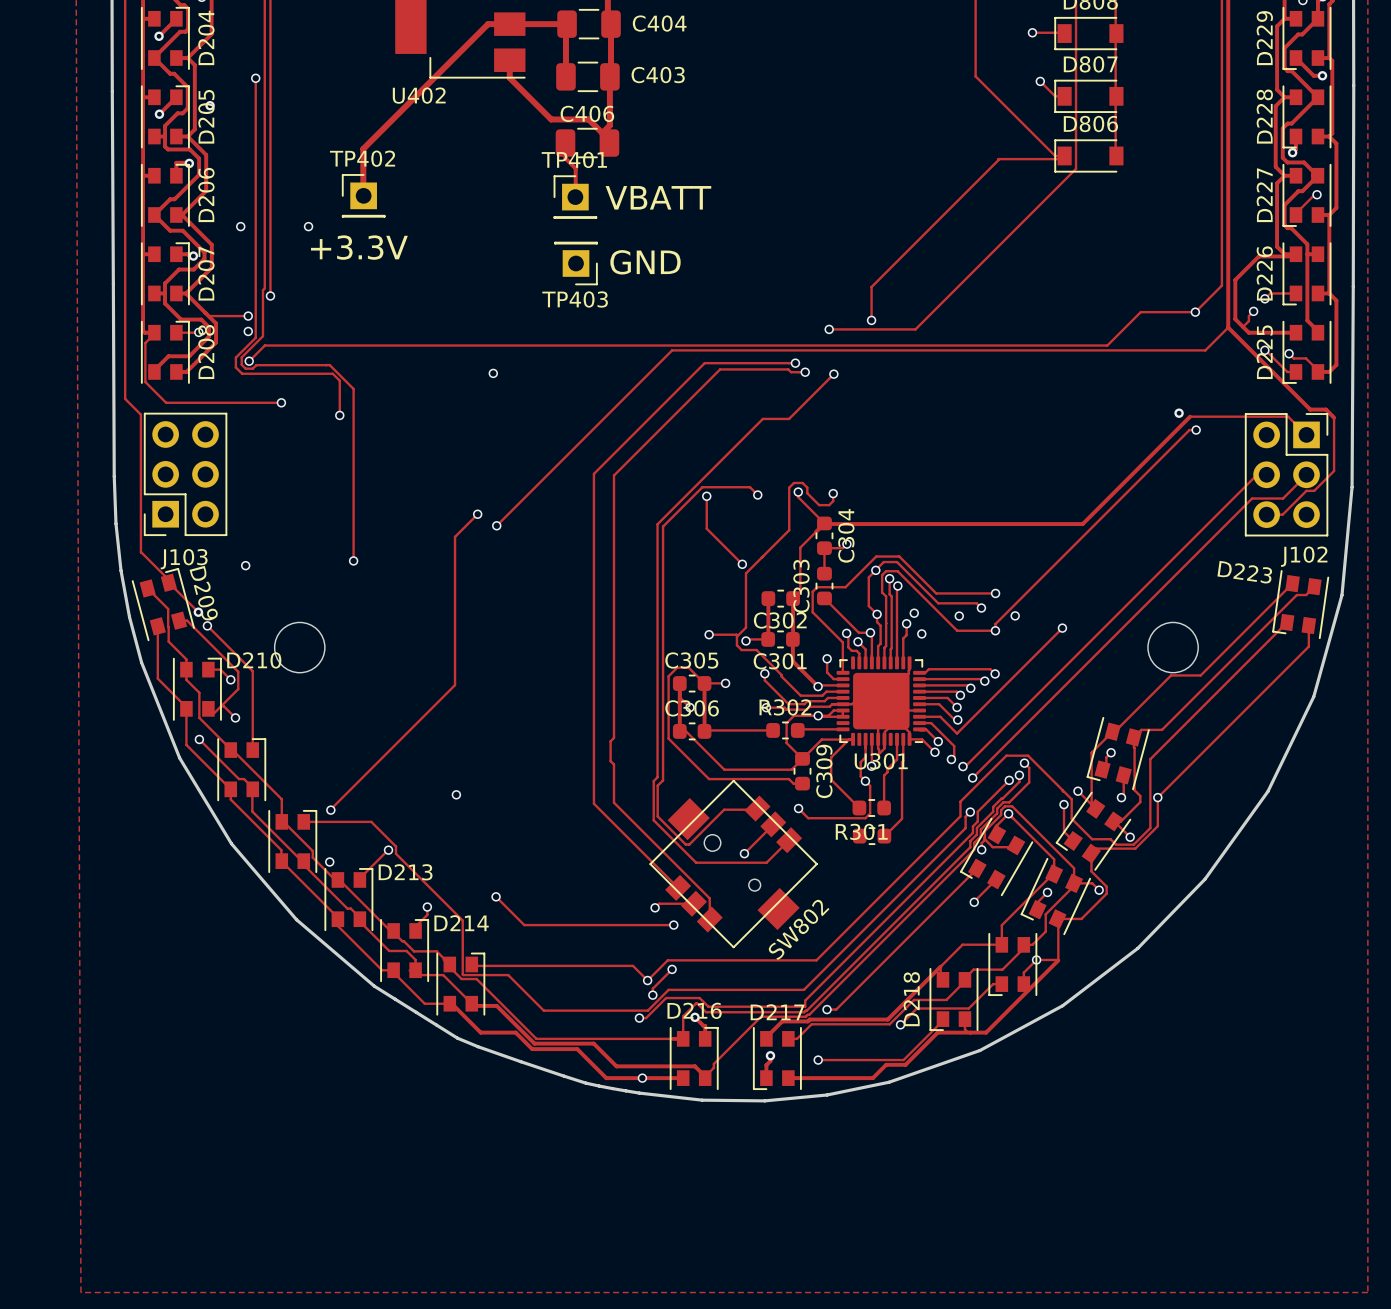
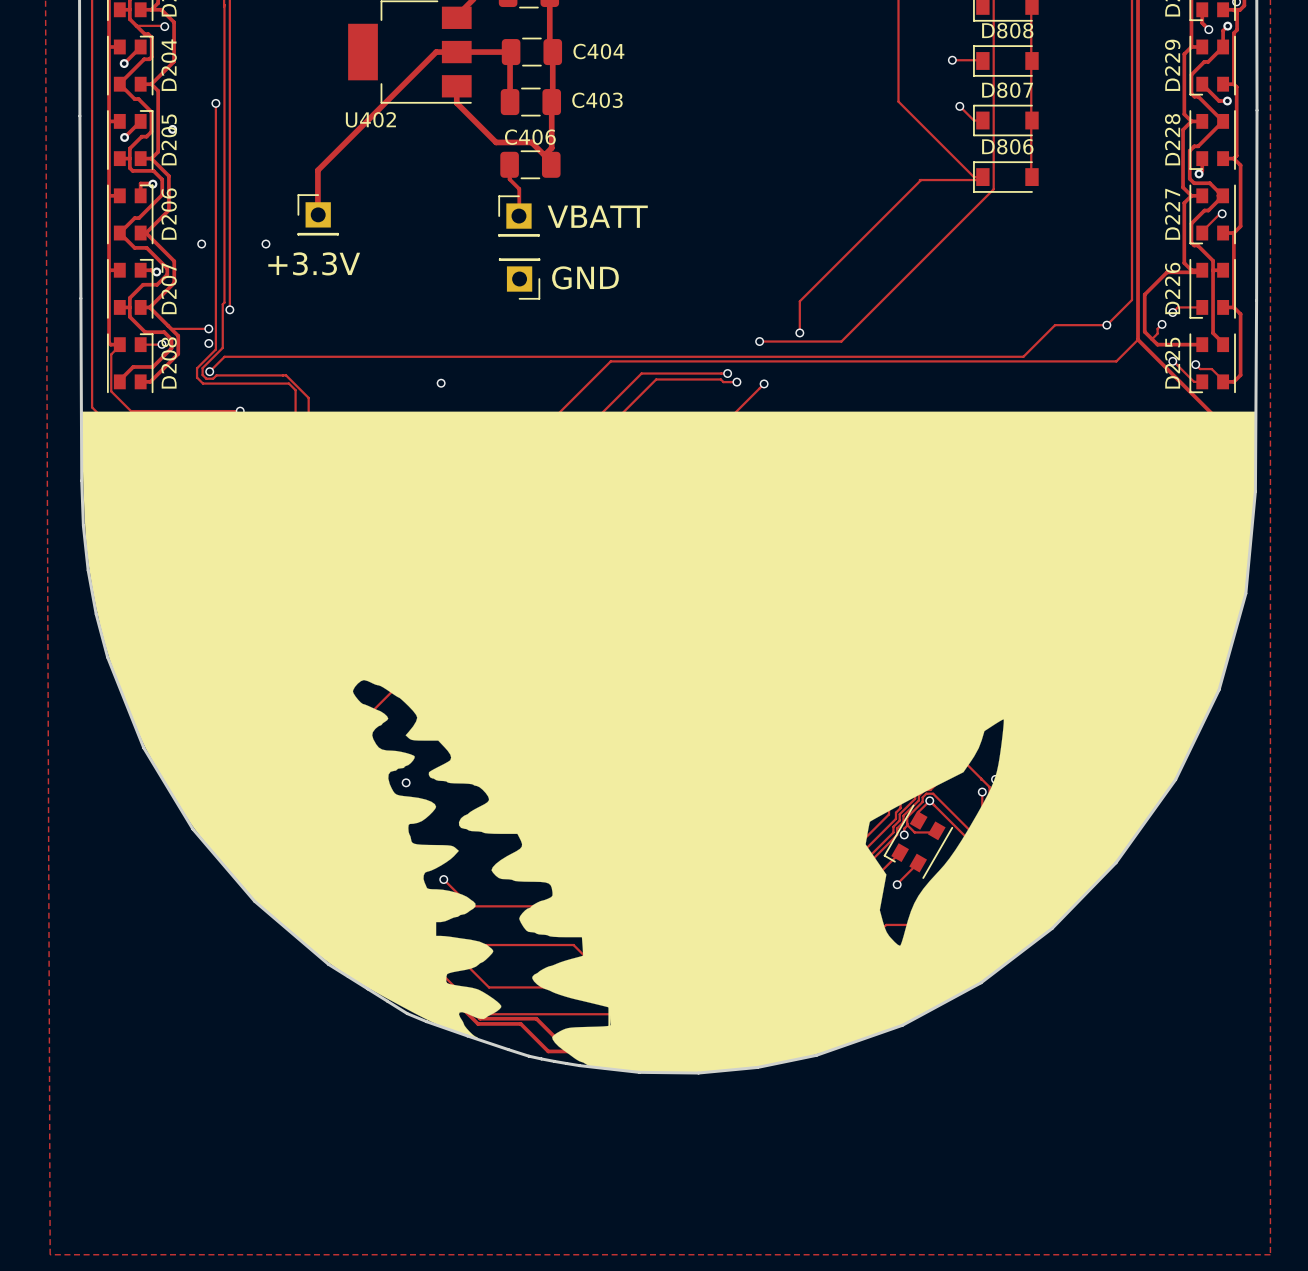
TP402 name: TP402 (362, 158) -> none
TP401 name: TP401 (574, 159) -> none
TP403 name: TP403 (575, 299) -> none
drawing: none -> [81, 411, 1257, 1074]
J103 name: J103 (184, 559) -> none

